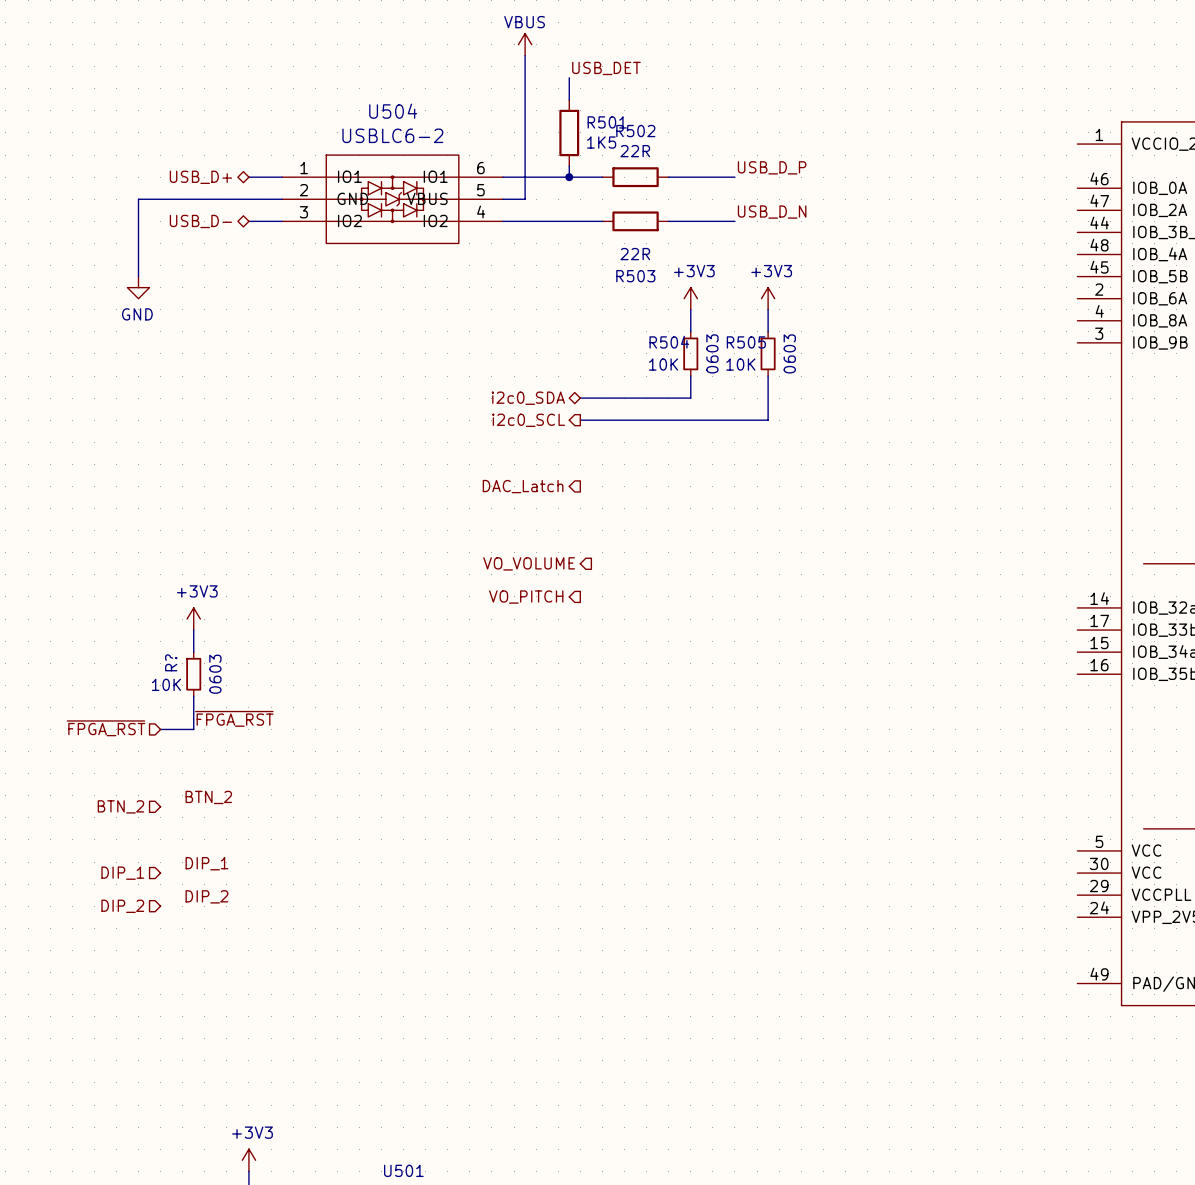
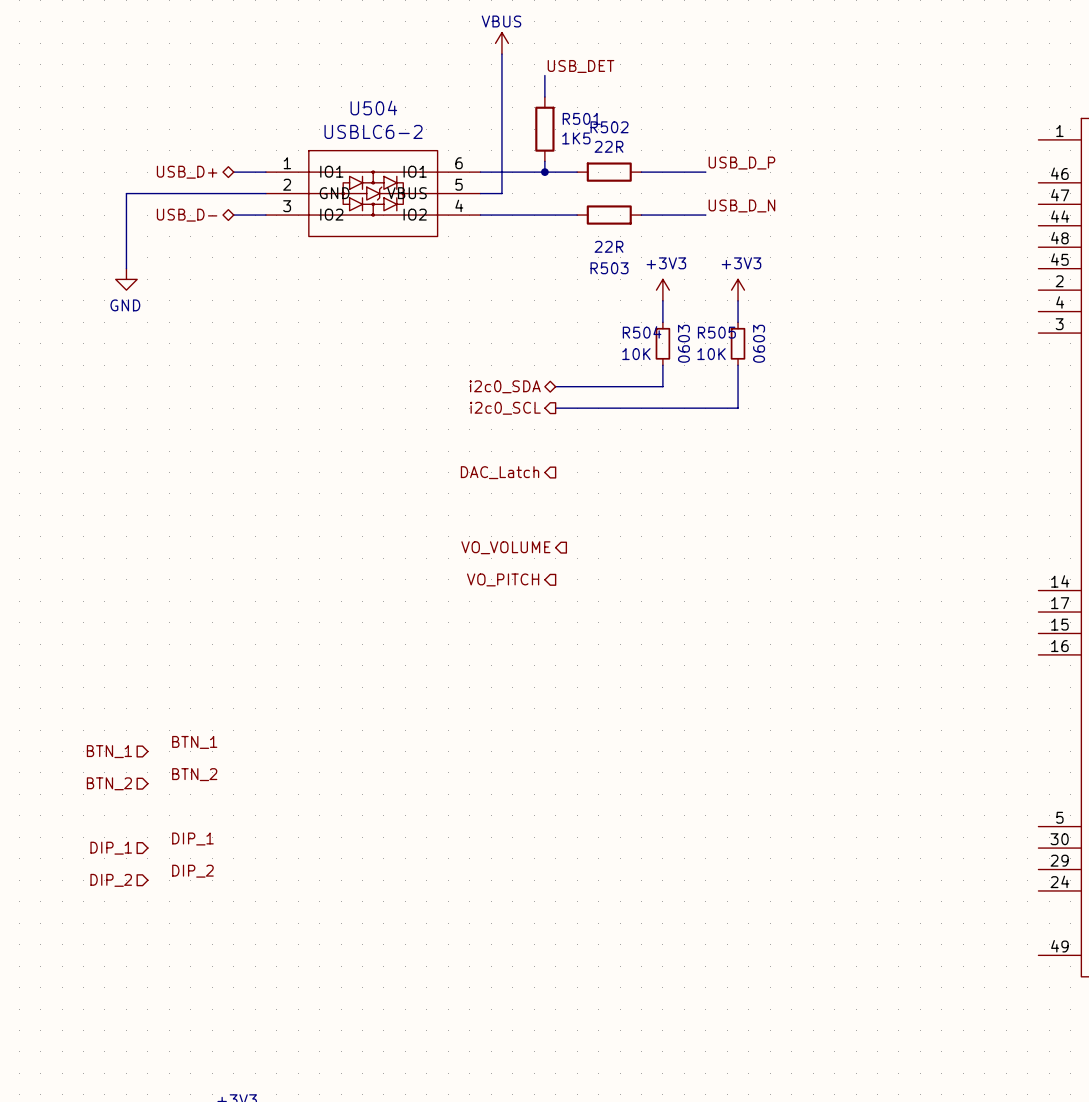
power symbol: +3V3 (193, 619) -> none
wire: (193, 630) (193, 652) -> none
R?: 10K (193, 674) -> none
wire: (193, 696) (193, 729) (160, 729) -> none
label: ~{FPGA_RST} (234, 718) -> none
hierarchical label: ~{FPGA_RST} (106, 728) -> none
label: none -> BTN_1 (194, 742)
hierarchical label: none -> BTN_1 (109, 751)

